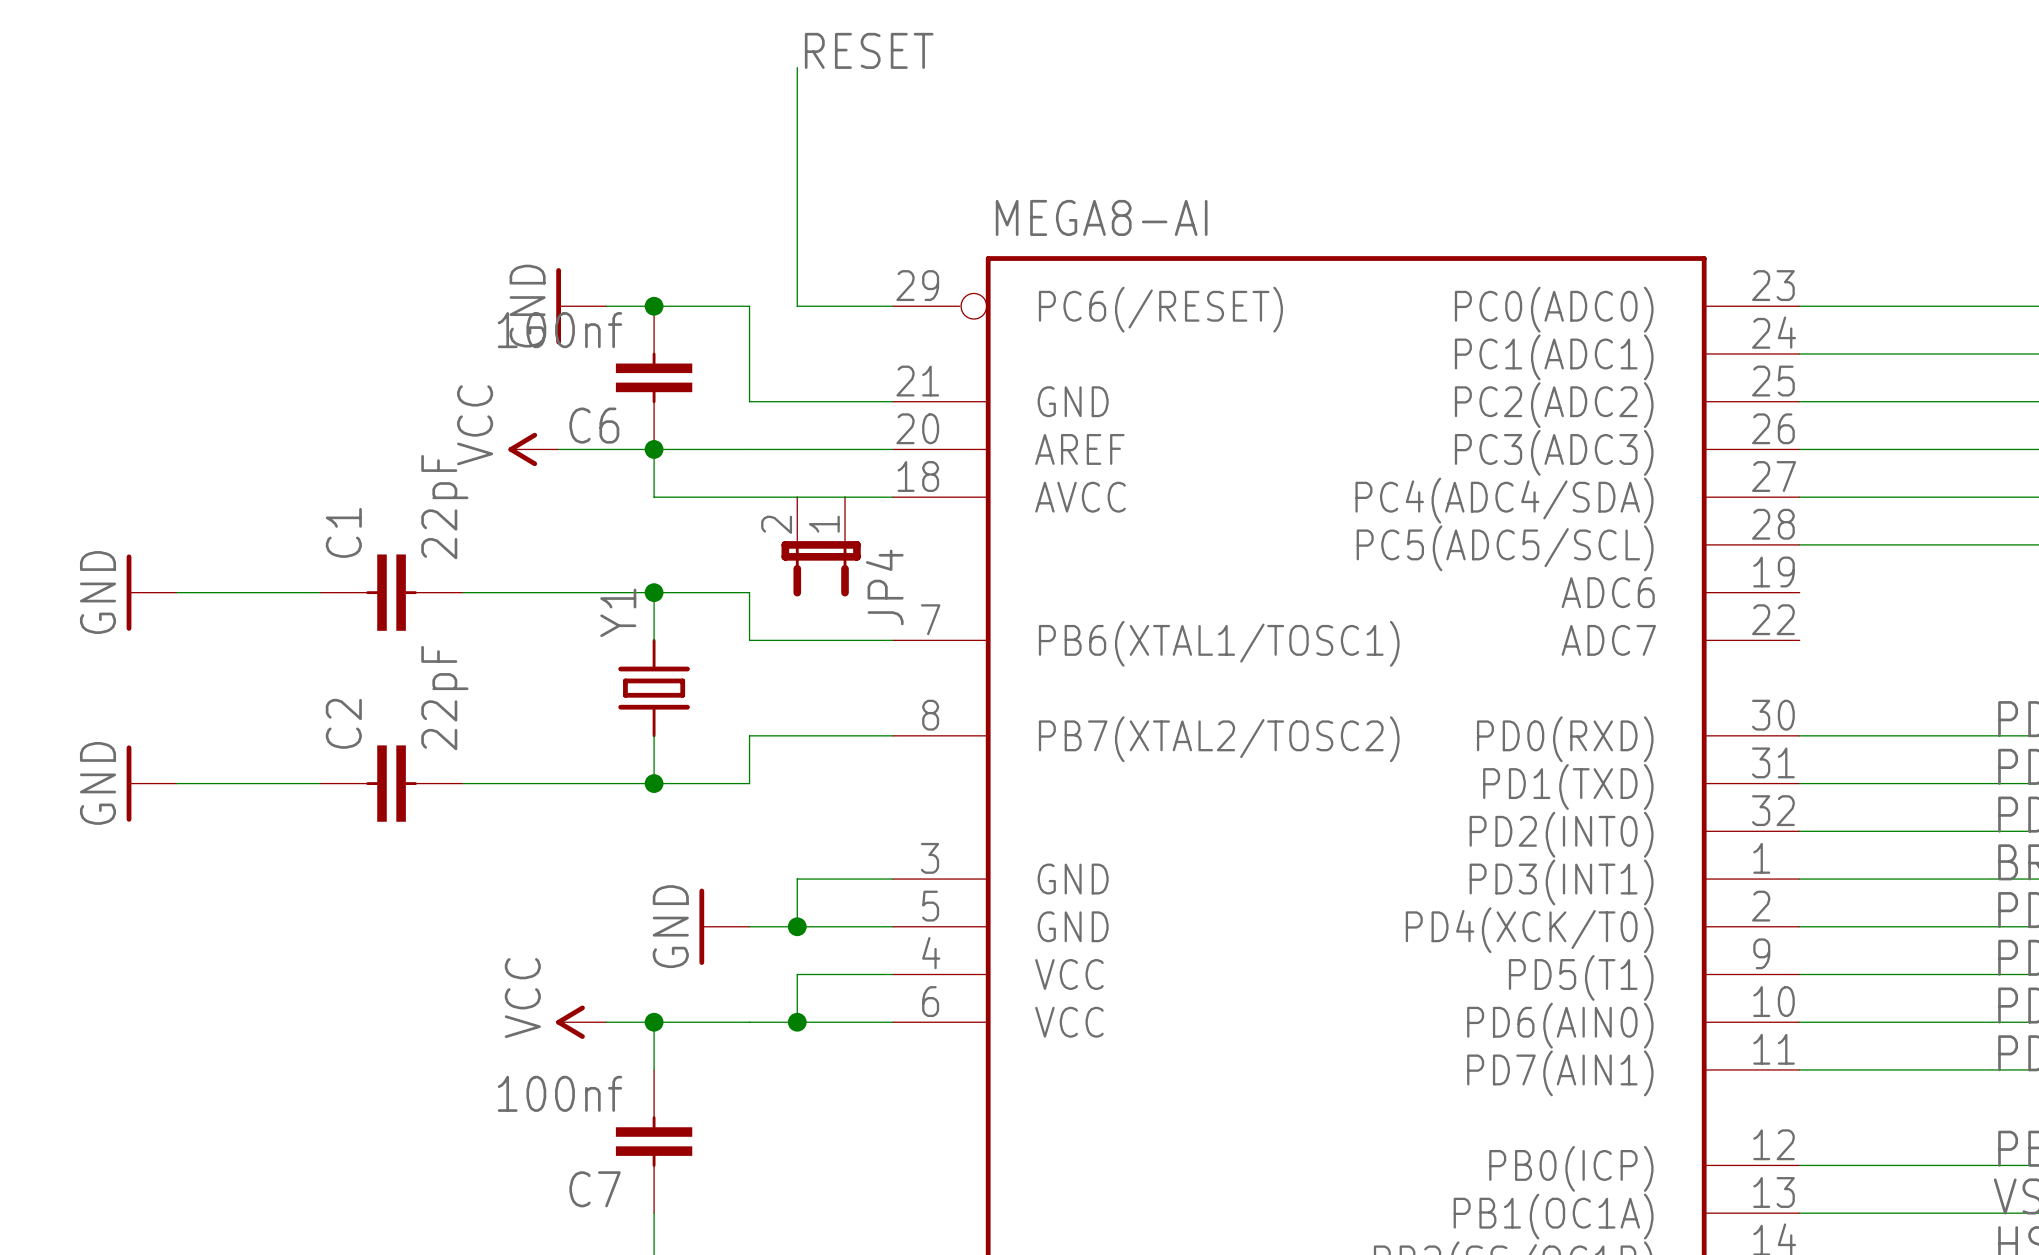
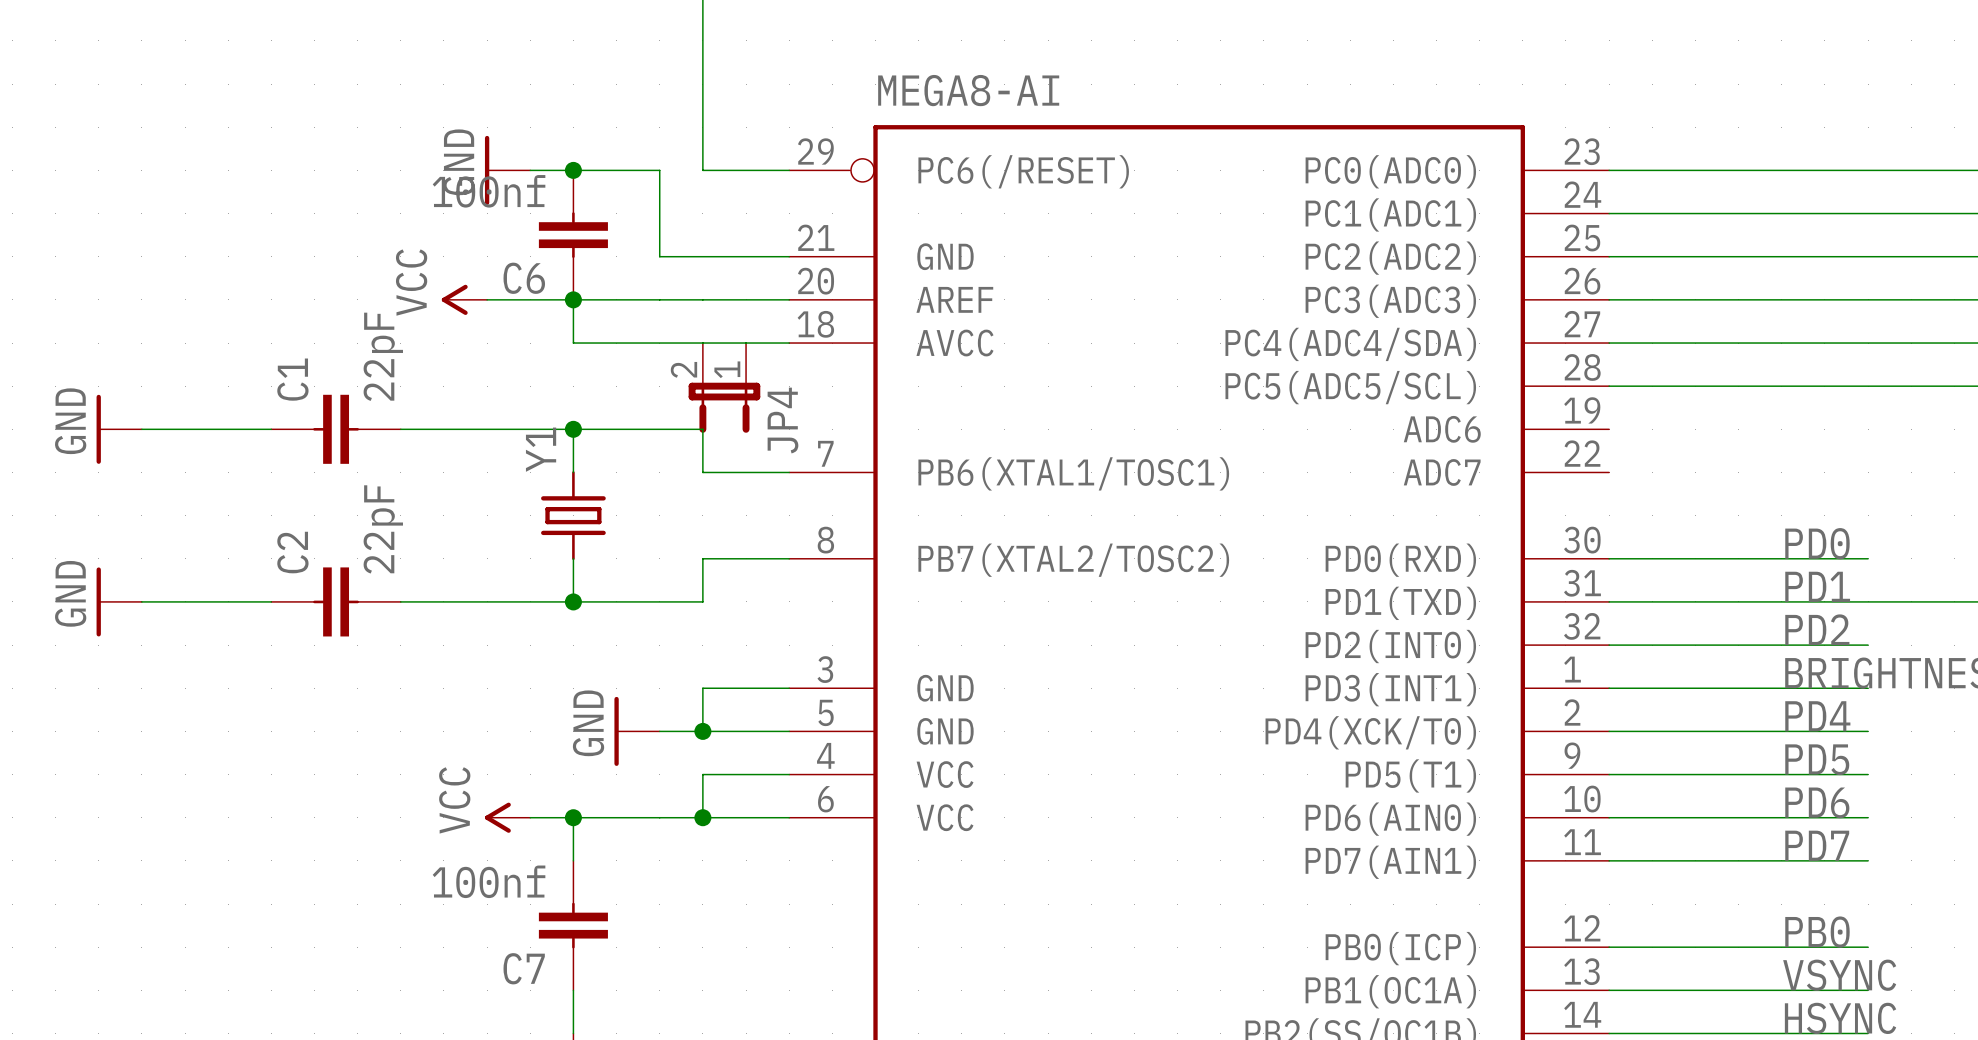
wire: (749, 592) (749, 640) (797, 640) -> (659, 429) (702, 429) (702, 472)
wire: (797, 735) (749, 735) (749, 783) -> (702, 558) (702, 601) (659, 601)

